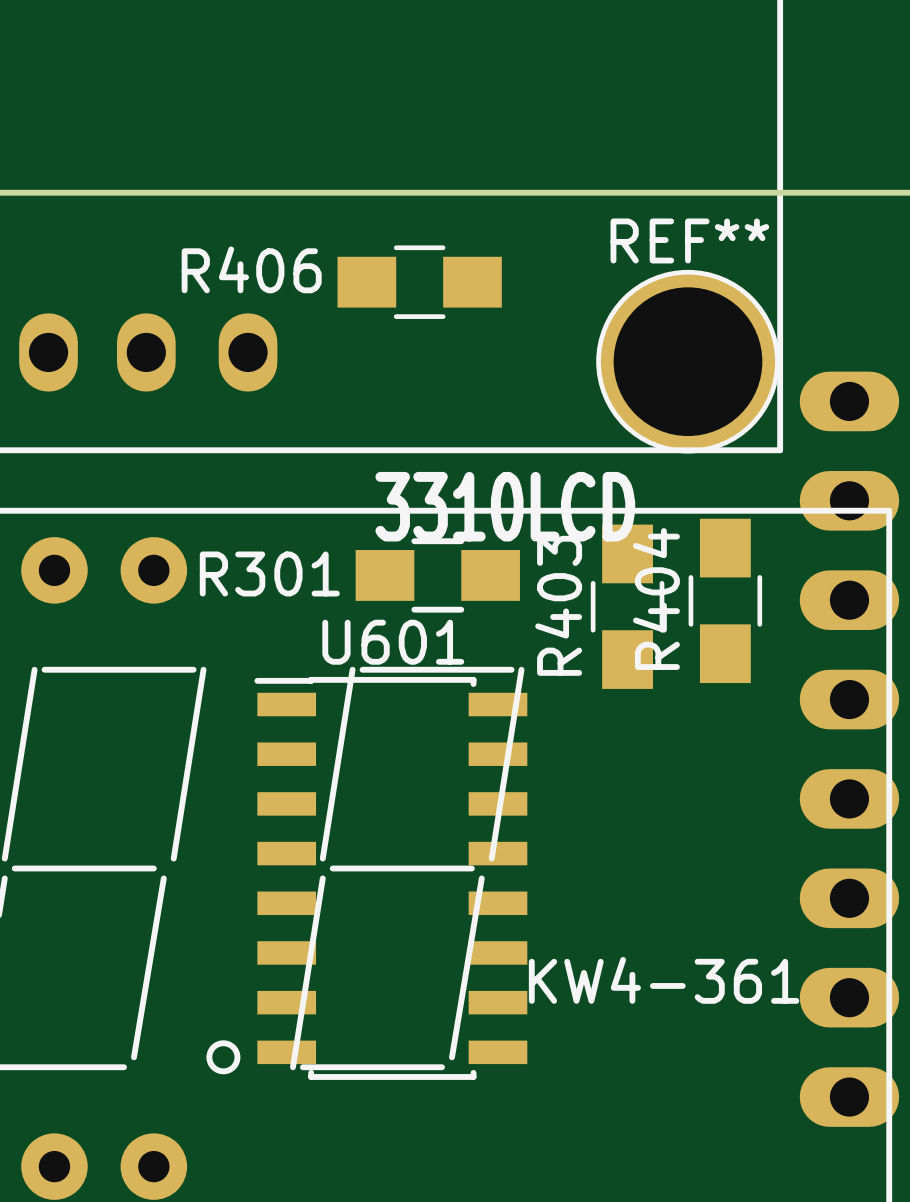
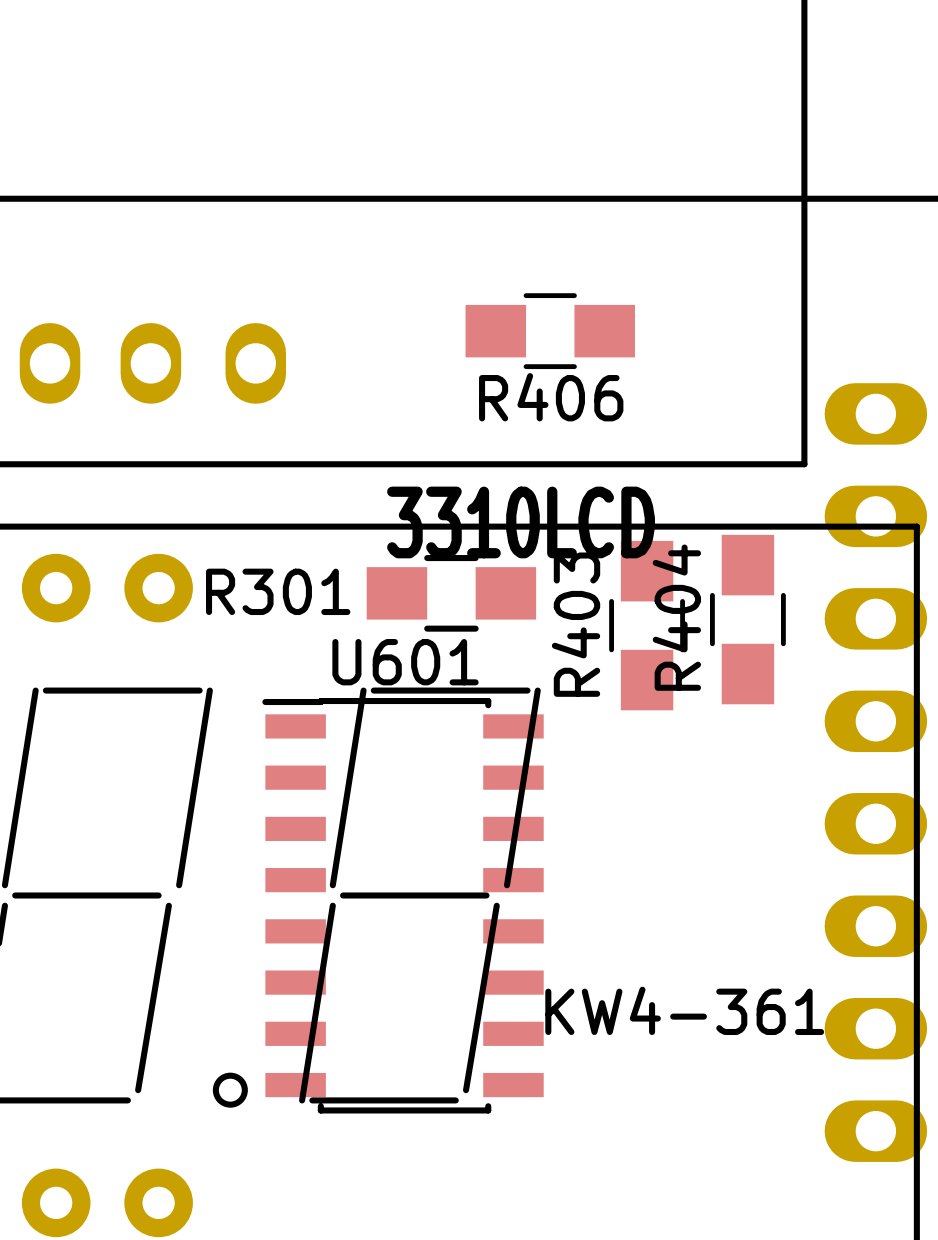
R406 name position: R406 (251, 269) -> R406 (551, 397)
R406 position: (419, 282) -> (550, 331)
REF**: (687, 361) -> none

